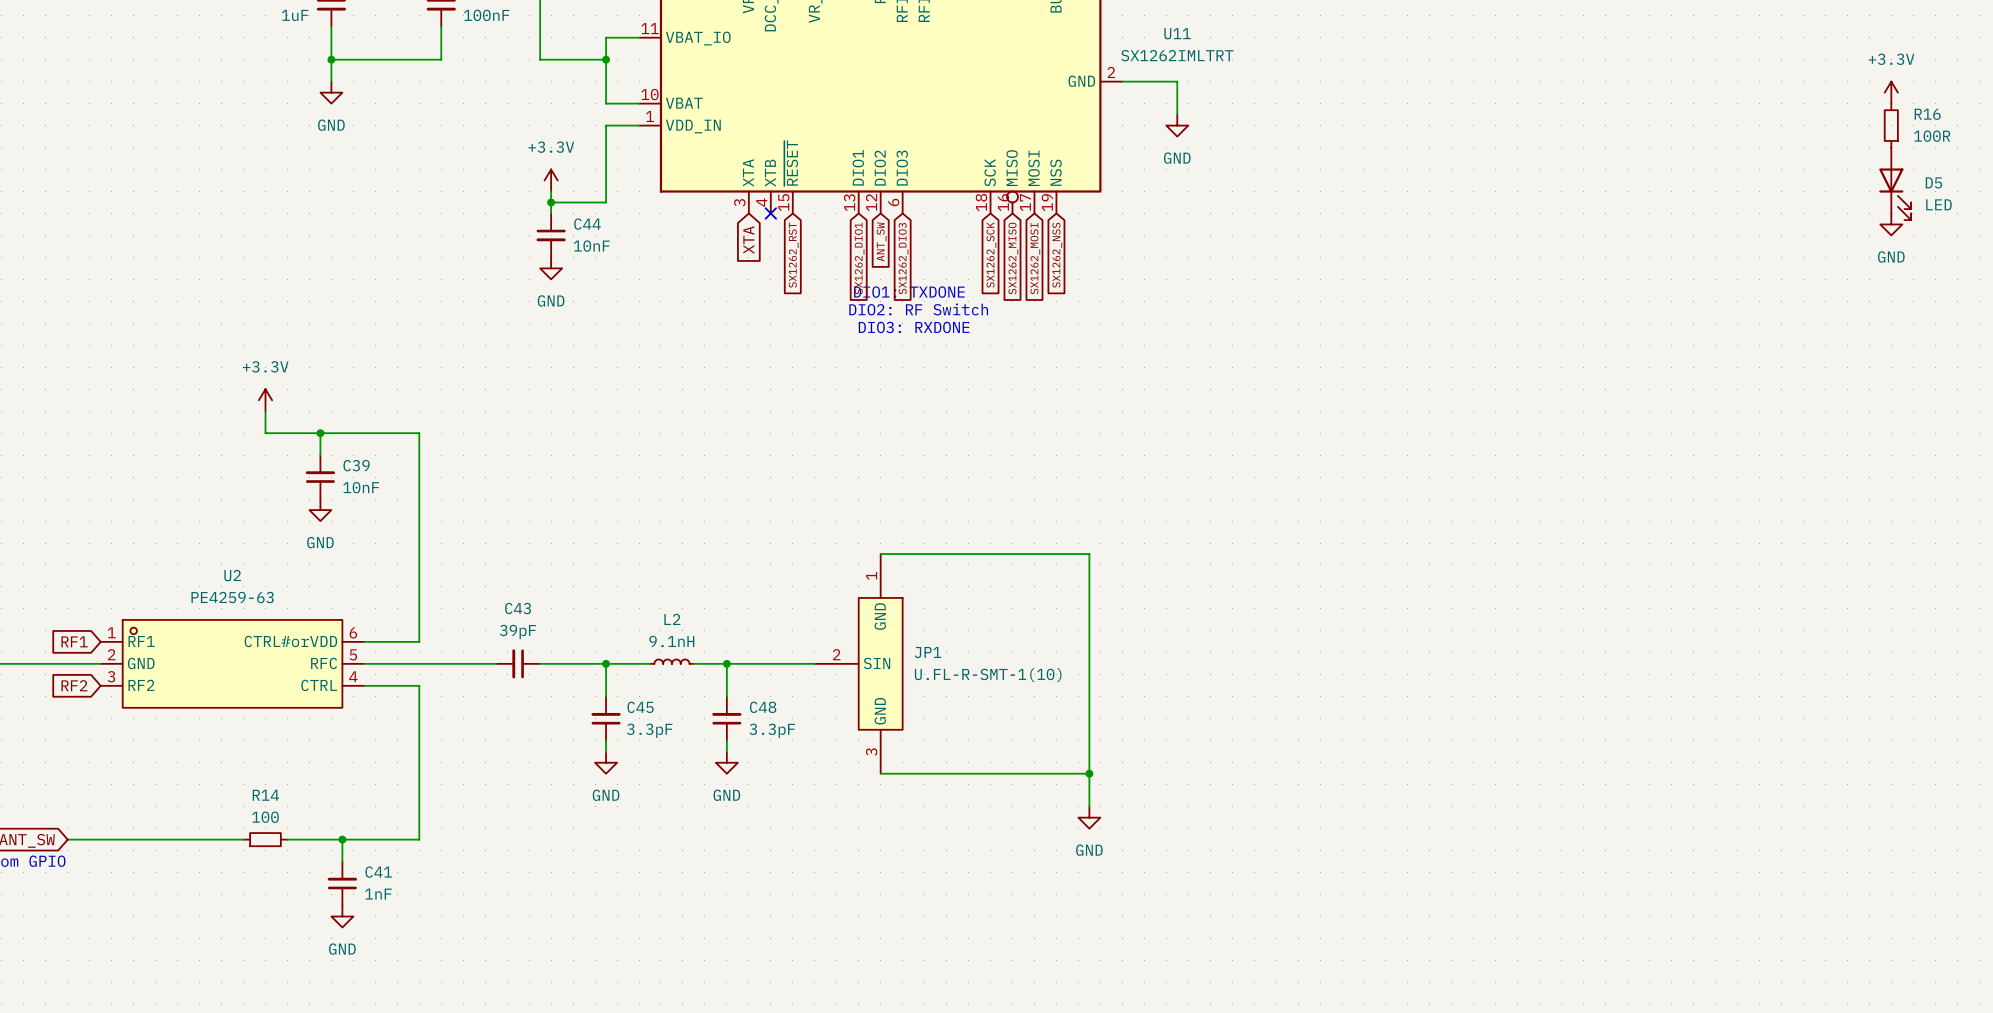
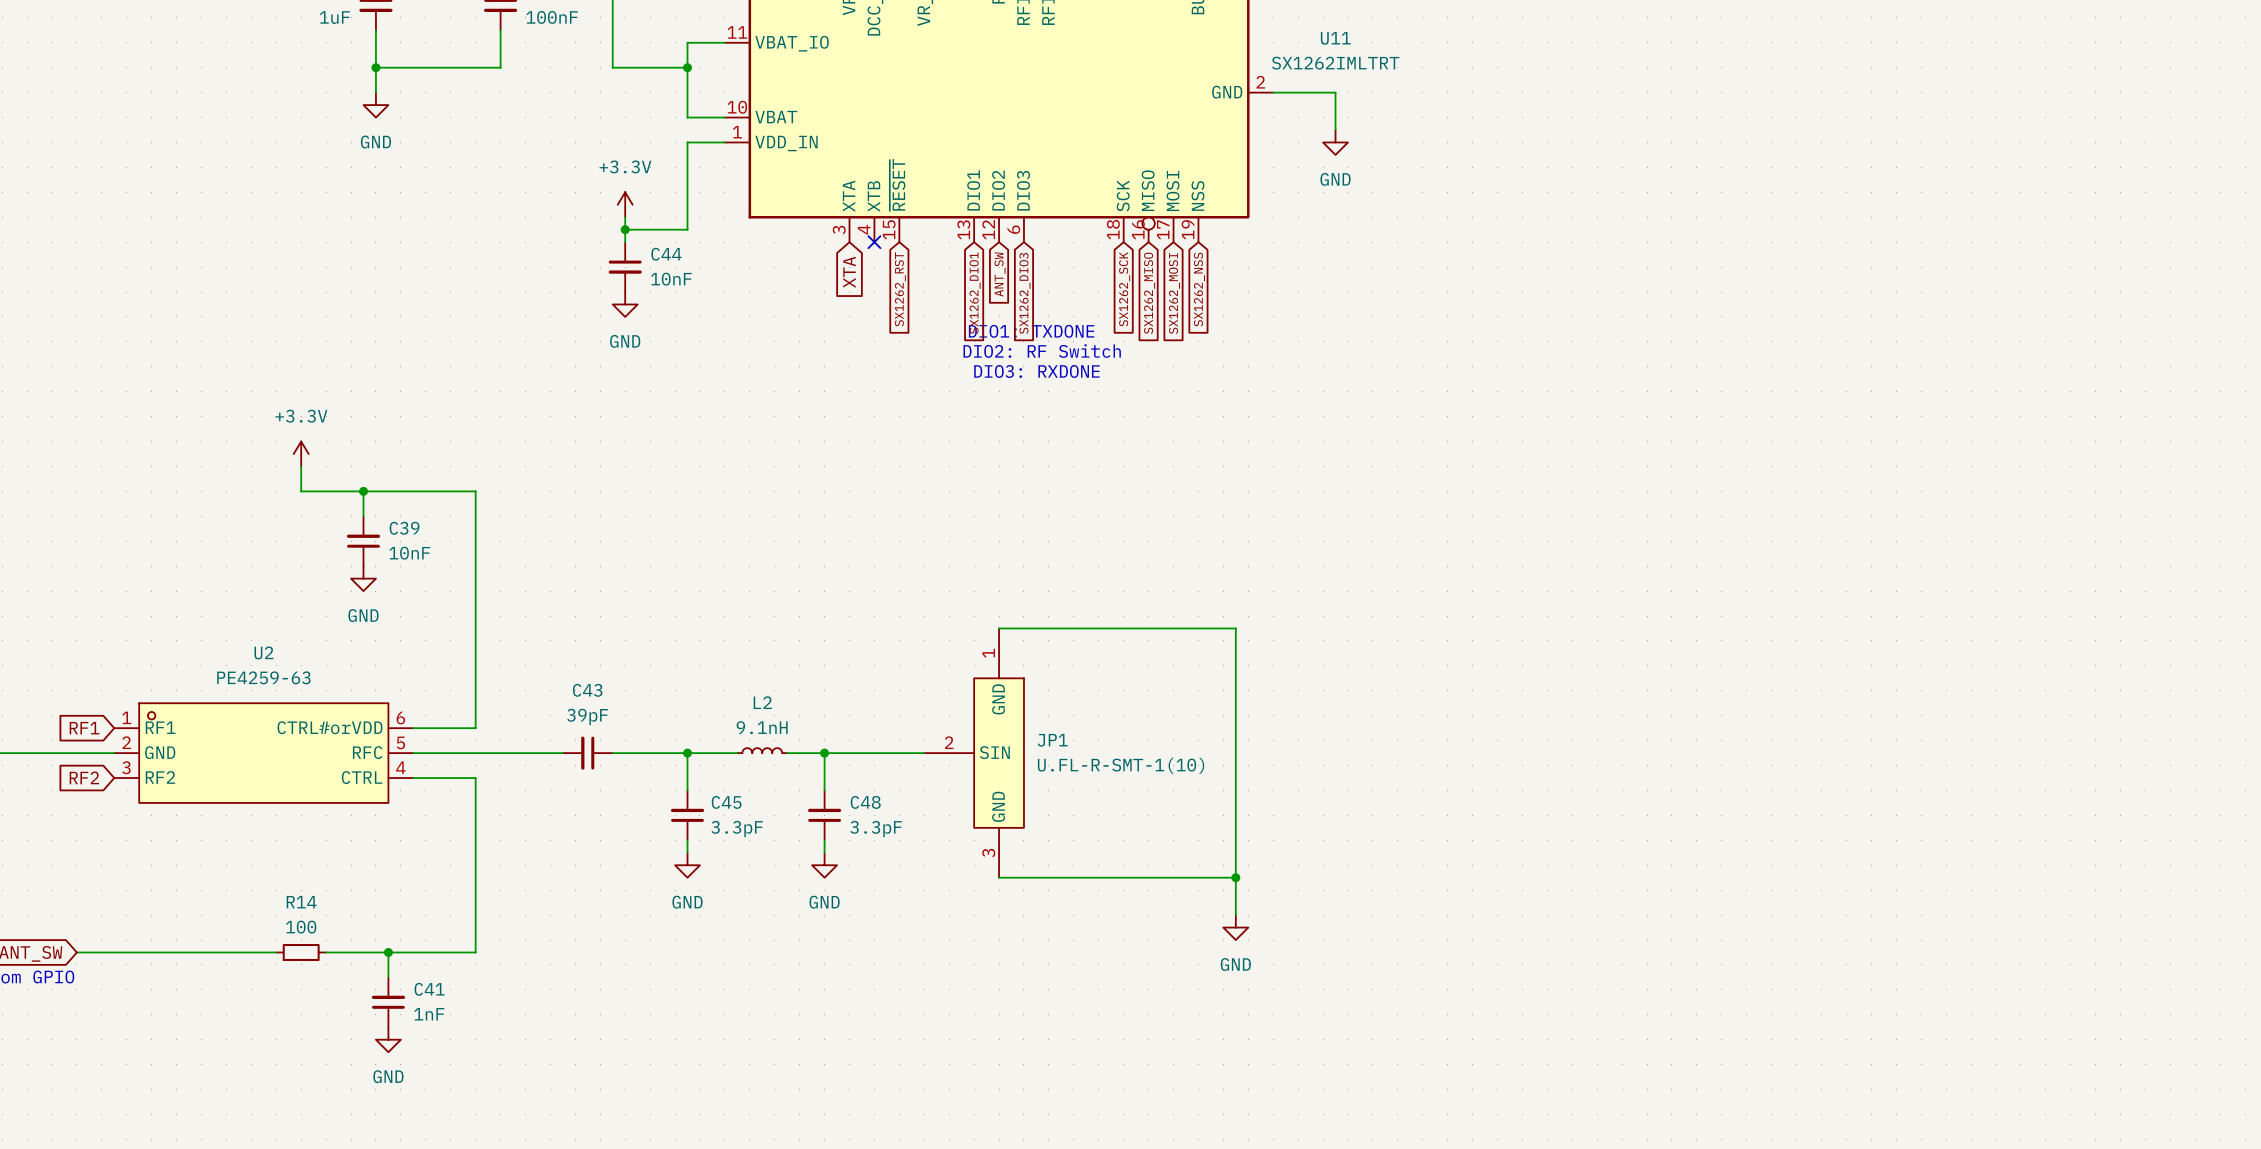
power symbol: +3.3V (1891, 92) -> none
R16: 100R (1891, 125) -> none
D5: LED (1895, 183) -> none
power symbol: GND (1891, 224) -> none

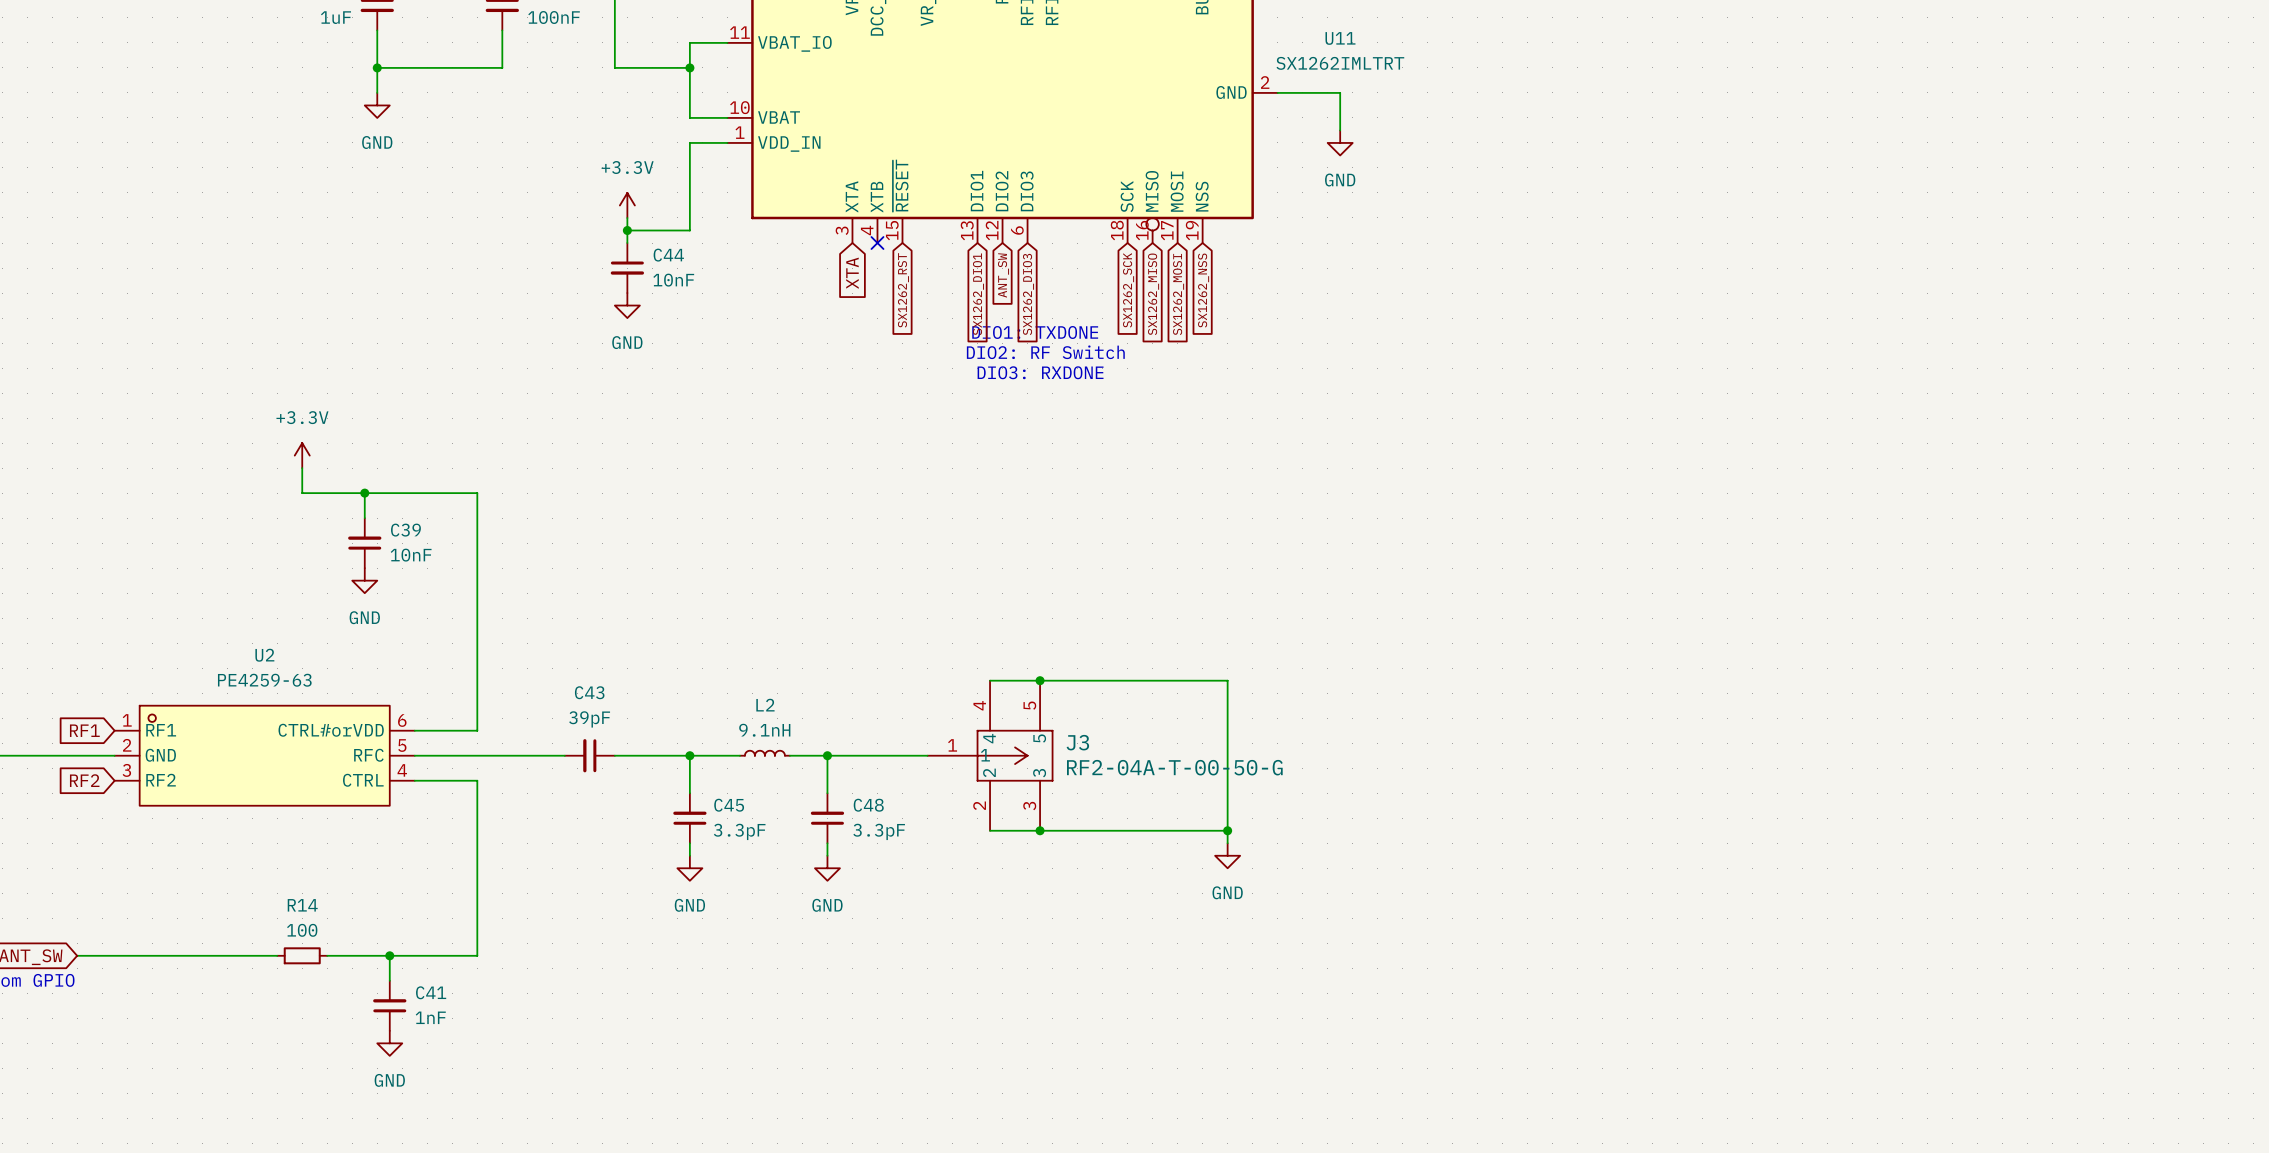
wire: (999, 628) (1235, 628) (1235, 915) -> none
wire: none -> (990, 680) (1227, 680) (1227, 843)
junction: none -> (1040, 680)
JP1: U.FL-R-SMT-1(10) (974, 753) -> none
J3: none -> RF2-04A-T-00-50-G (990, 755)
junction: none -> (1040, 830)
wire: (999, 877) (1235, 877) -> (990, 830) (1227, 830)
junction position: (1235, 877) -> (1227, 830)
power symbol position: GND (1235, 927) -> GND (1227, 855)

